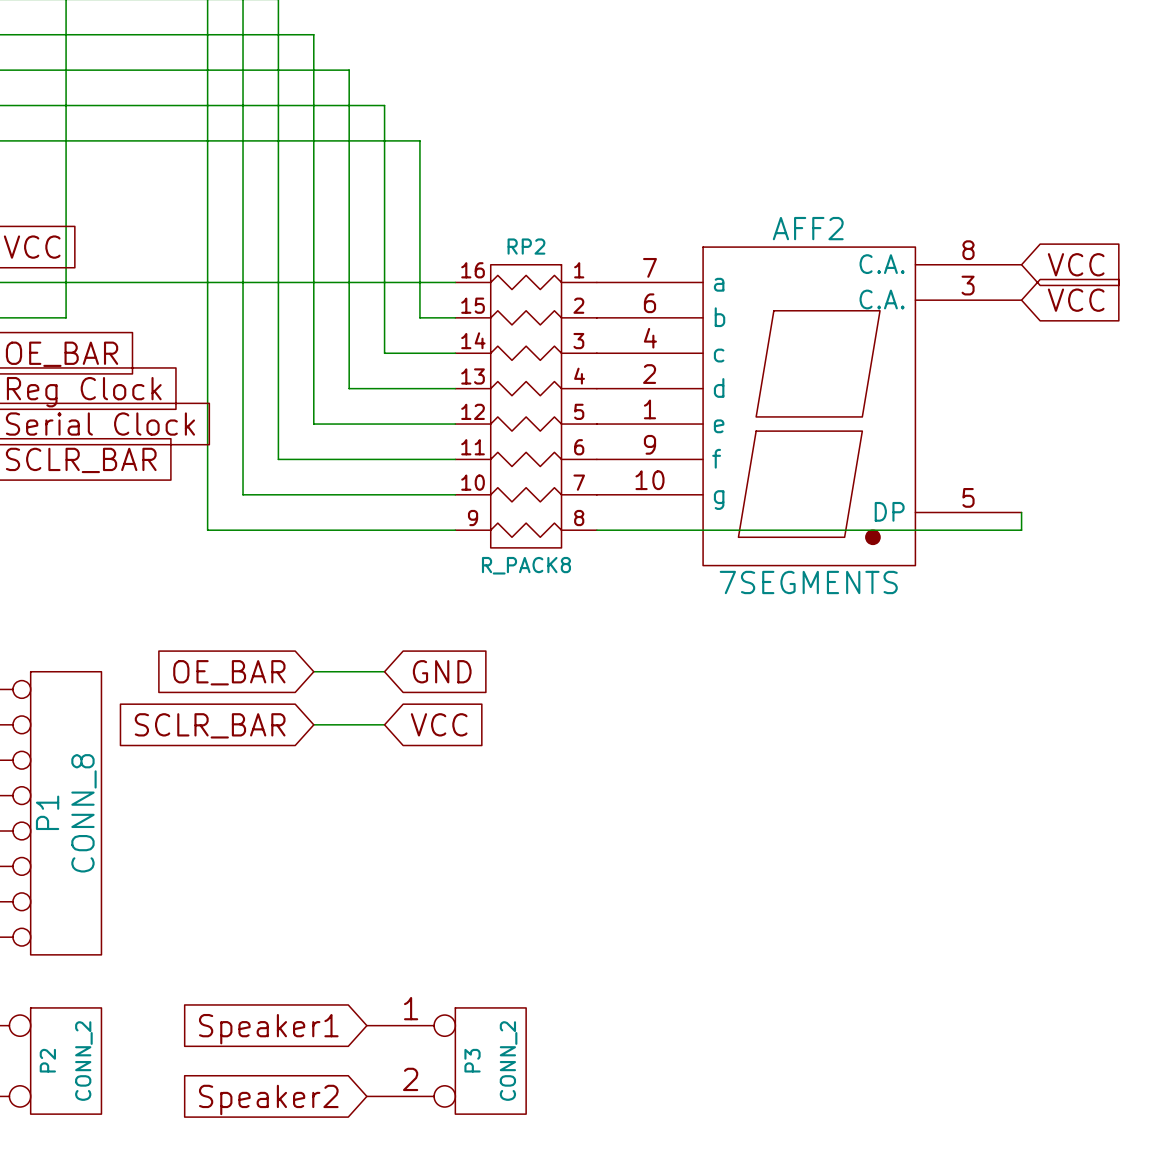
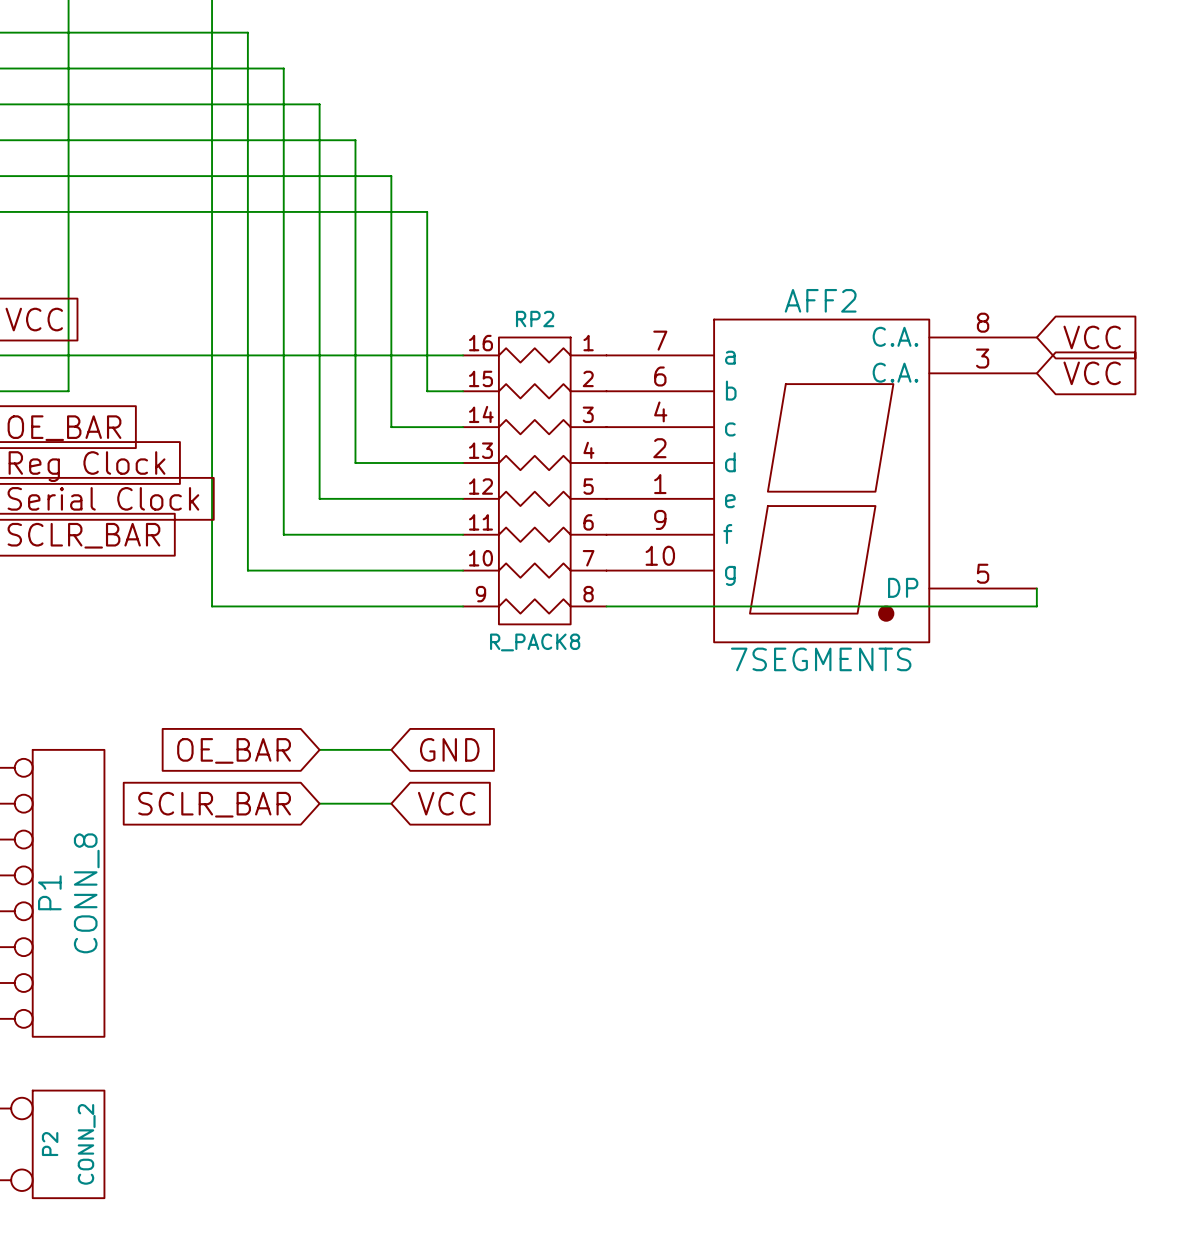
global label: Speaker1 (268, 1029) -> none
P3: CONN_2 (446, 1061) -> none
global label: Speaker2 (268, 1099) -> none

